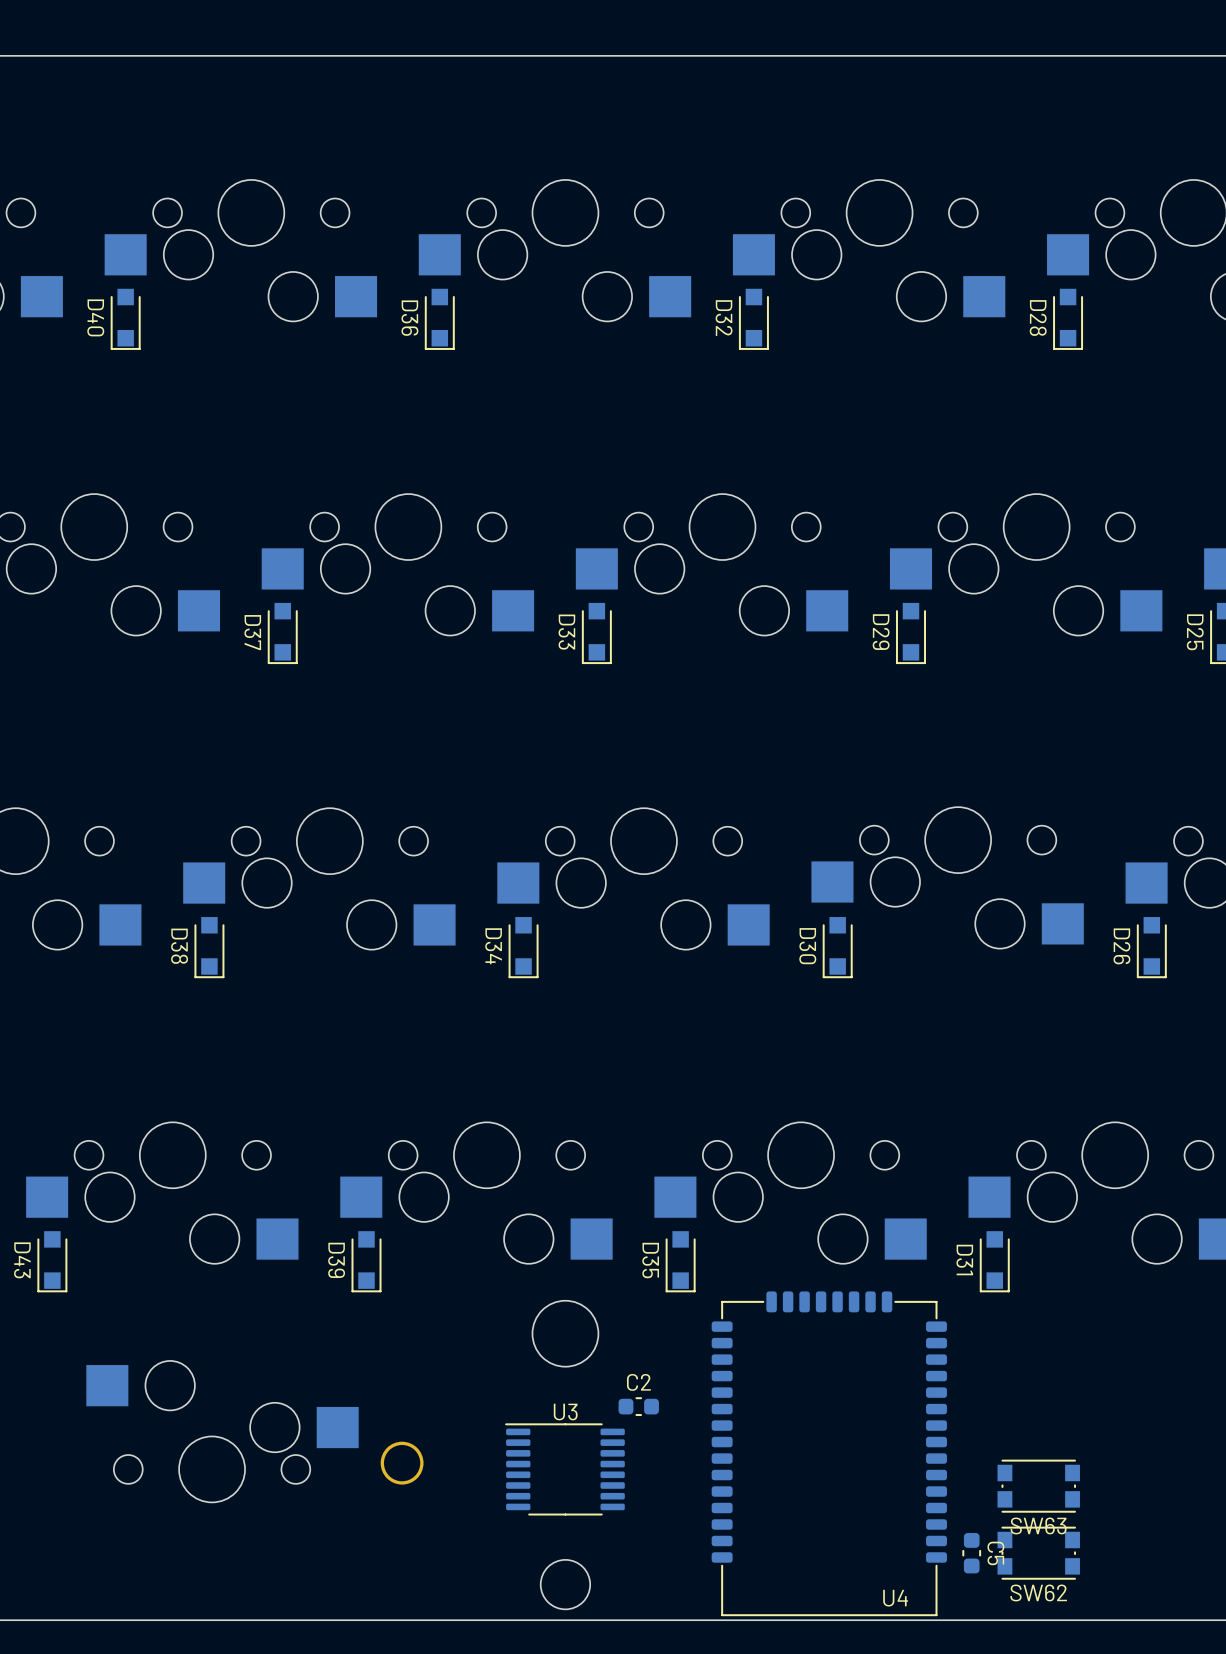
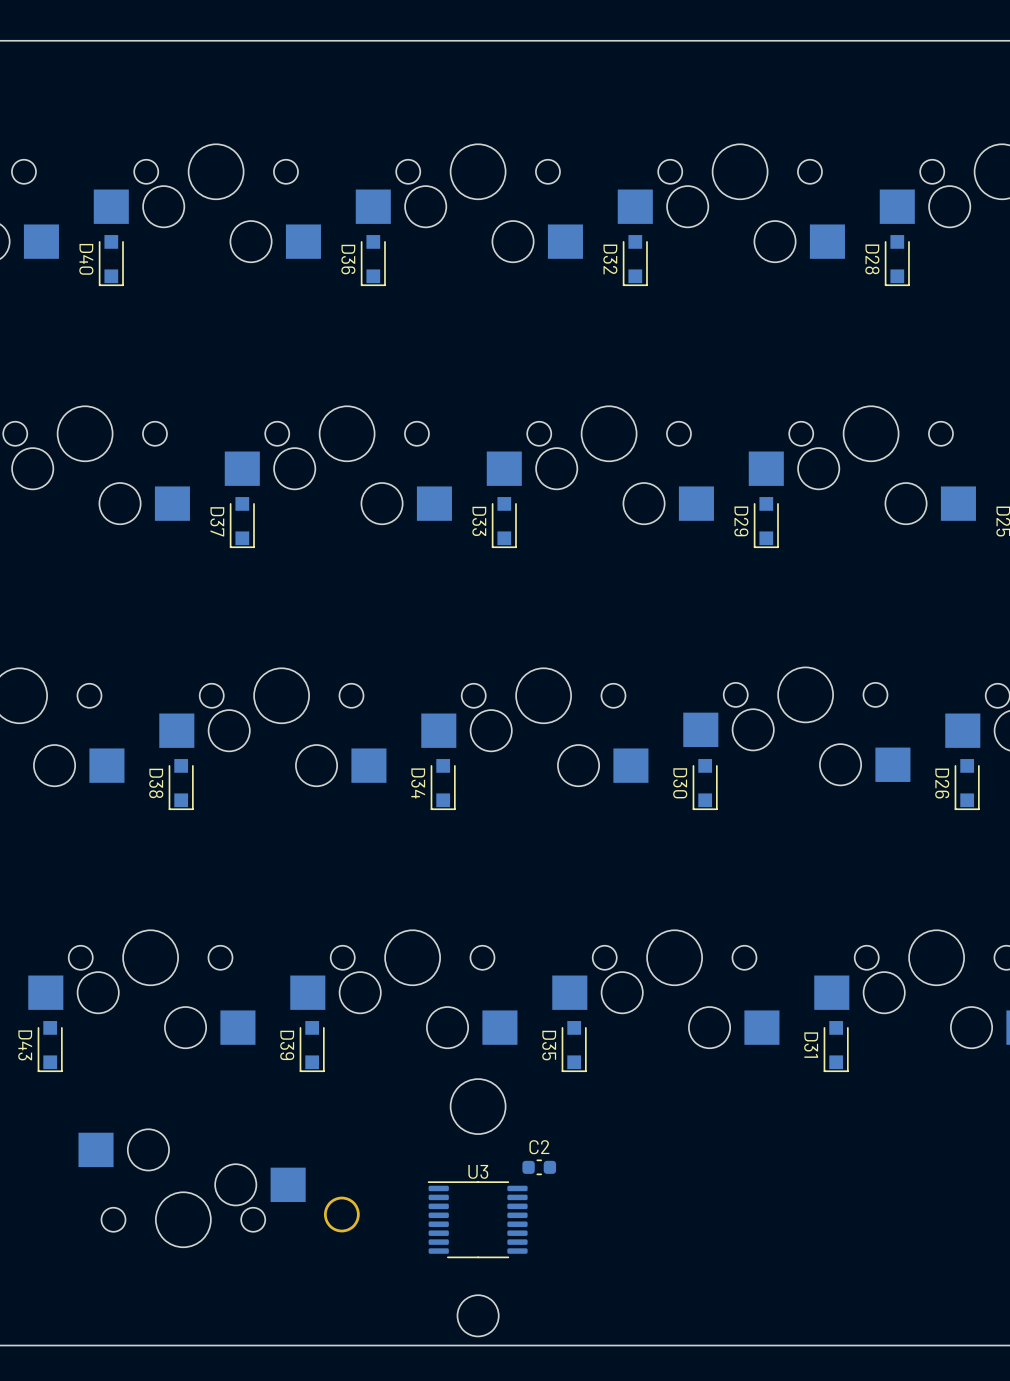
U4: (829, 1453) -> none
SW63: (1038, 1486) -> none
C5: (971, 1553) -> none
SW62: (1038, 1553) -> none

